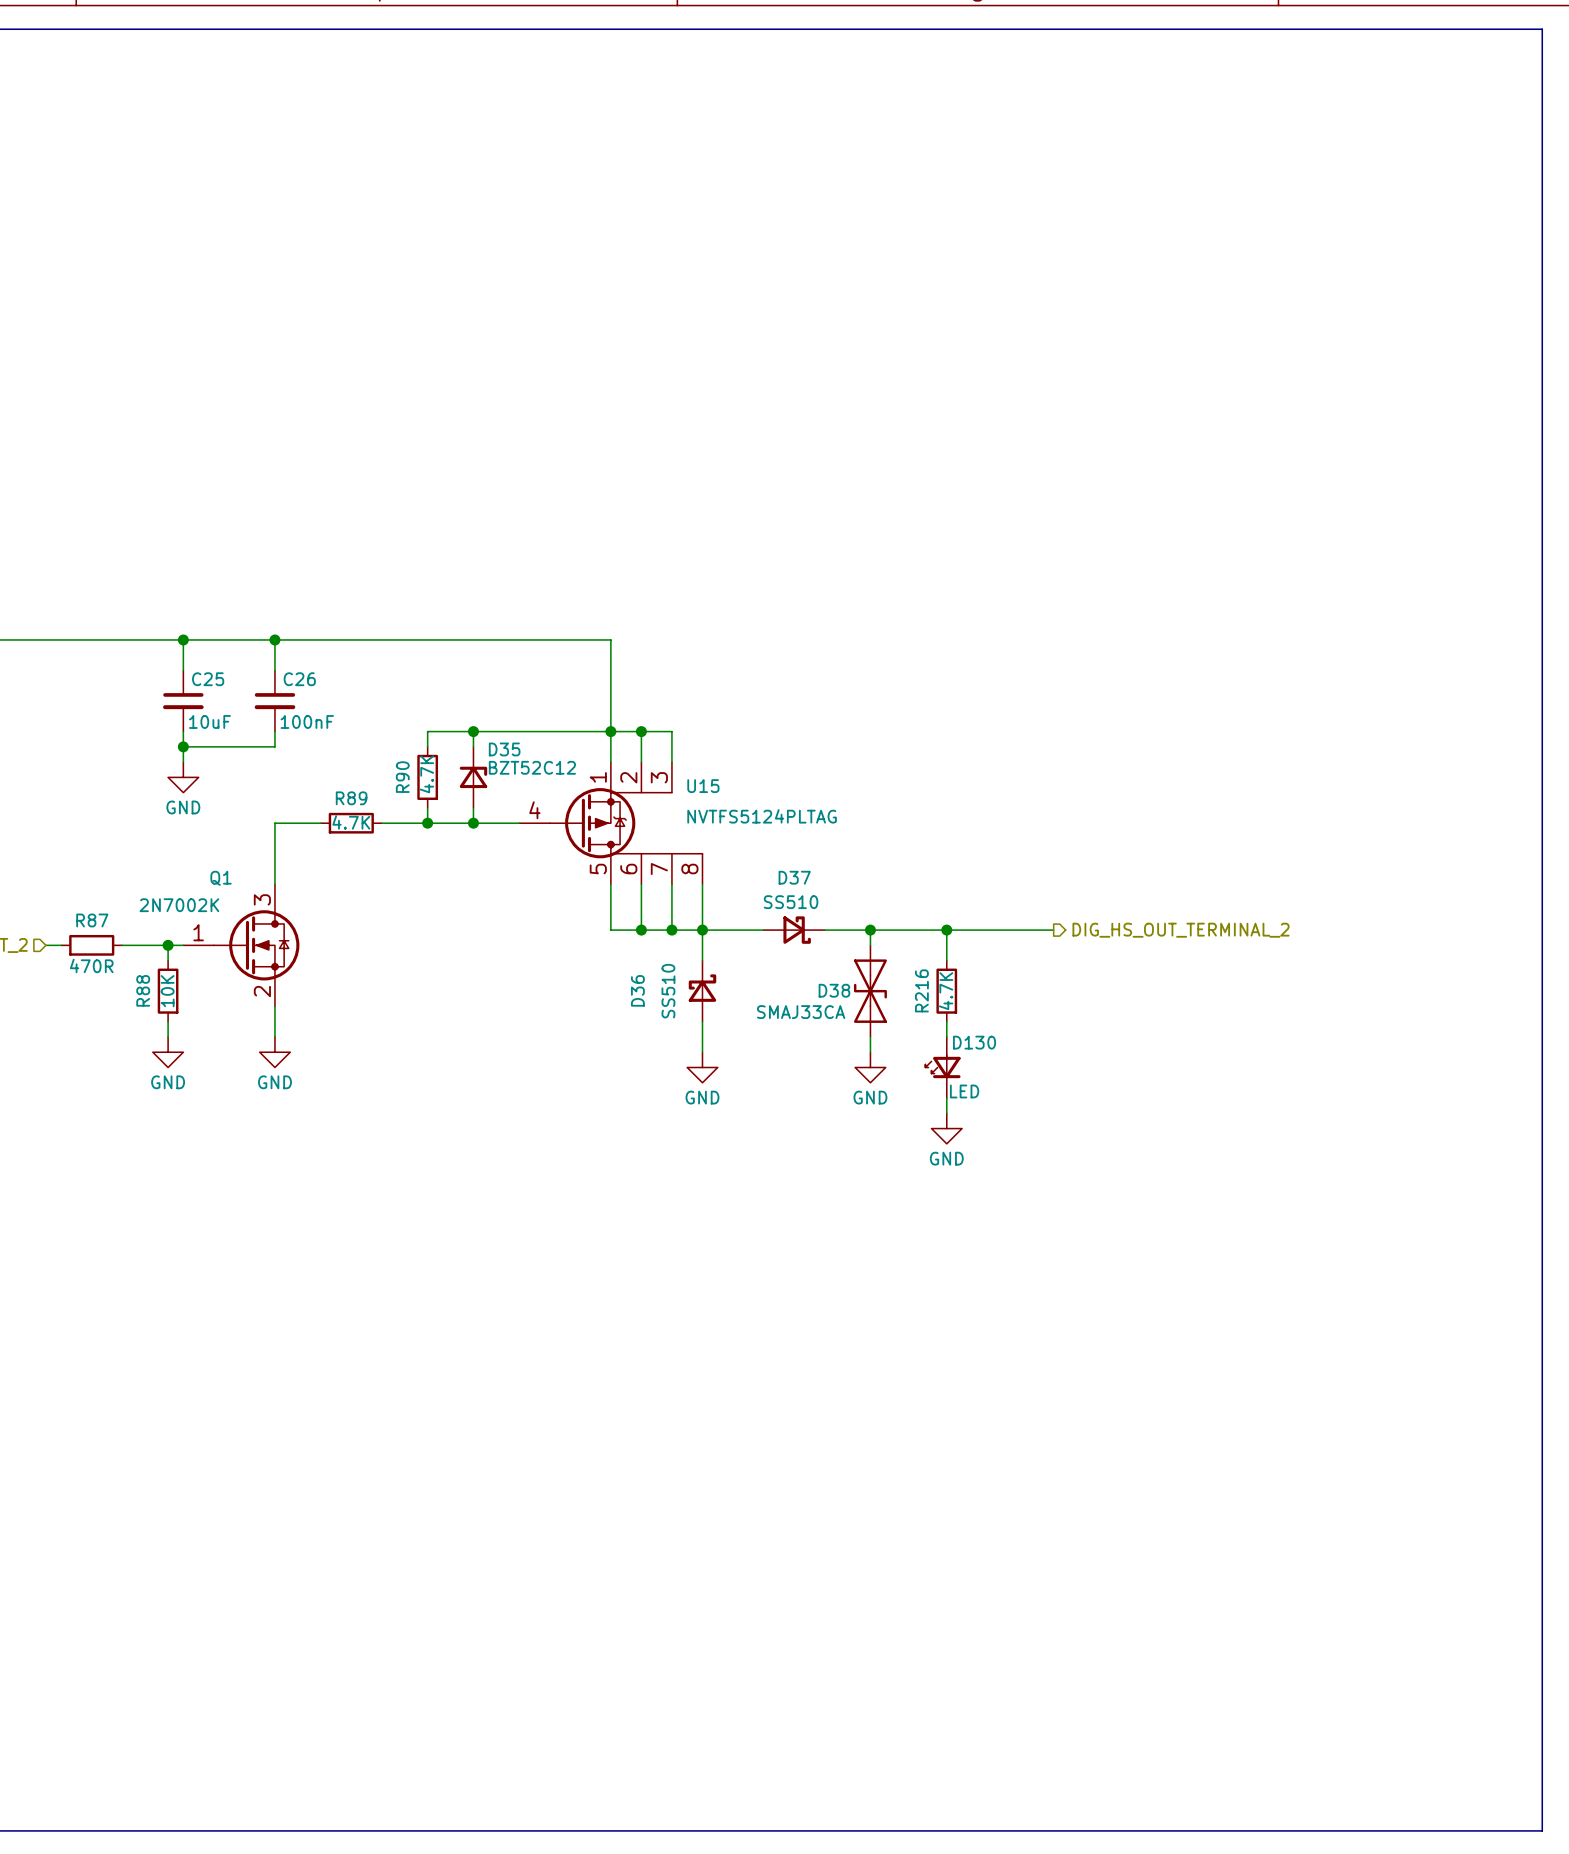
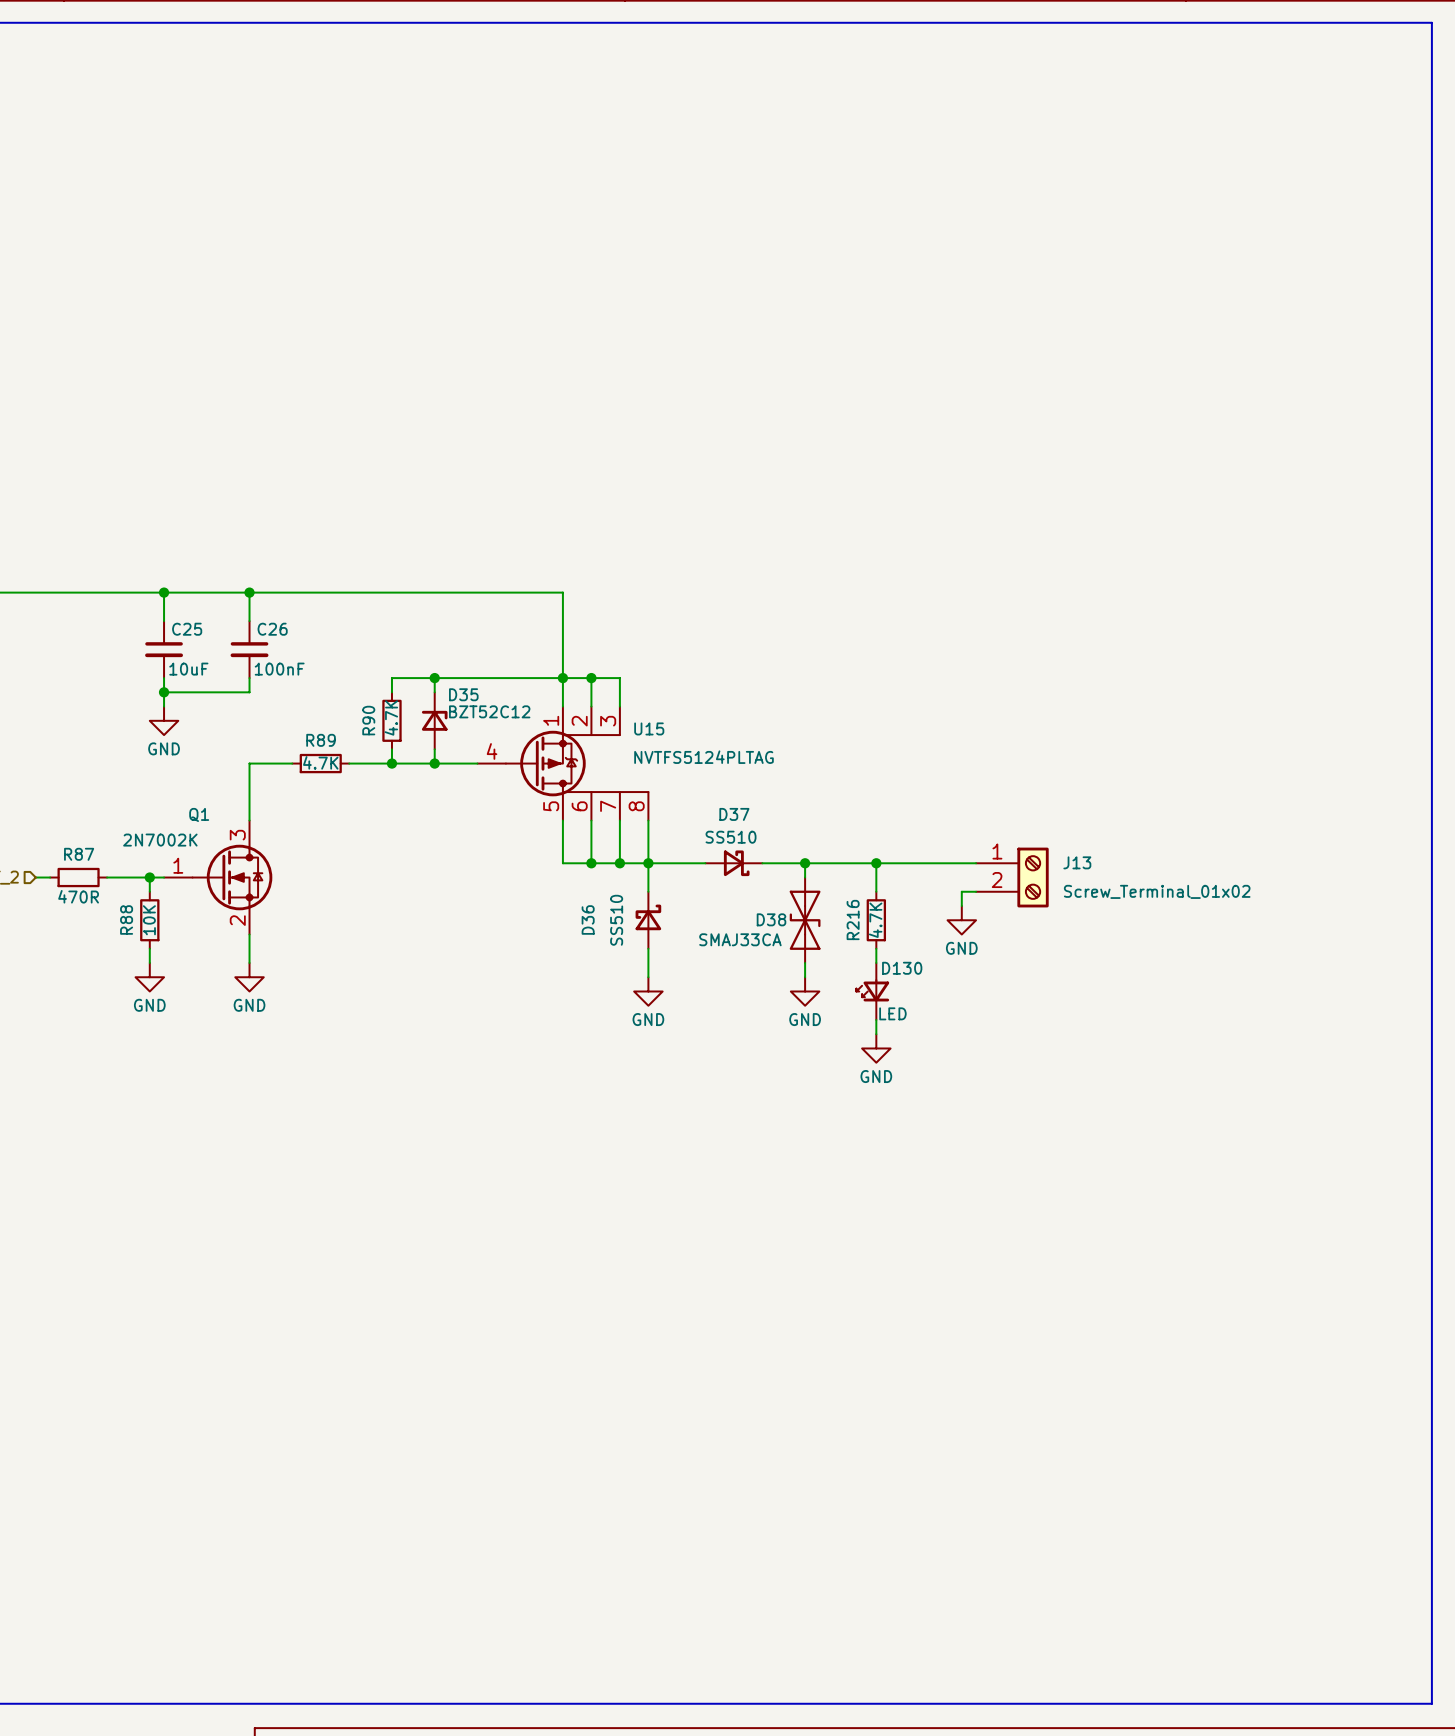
hierarchical label: DIG_HS_OUT_TERMINAL_2 (1181, 930) -> none
J13: none -> Screw_Terminal_01x02 (1012, 877)
wire: none -> (976, 891) (961, 891) (961, 906)
power symbol: none -> GND (961, 920)

